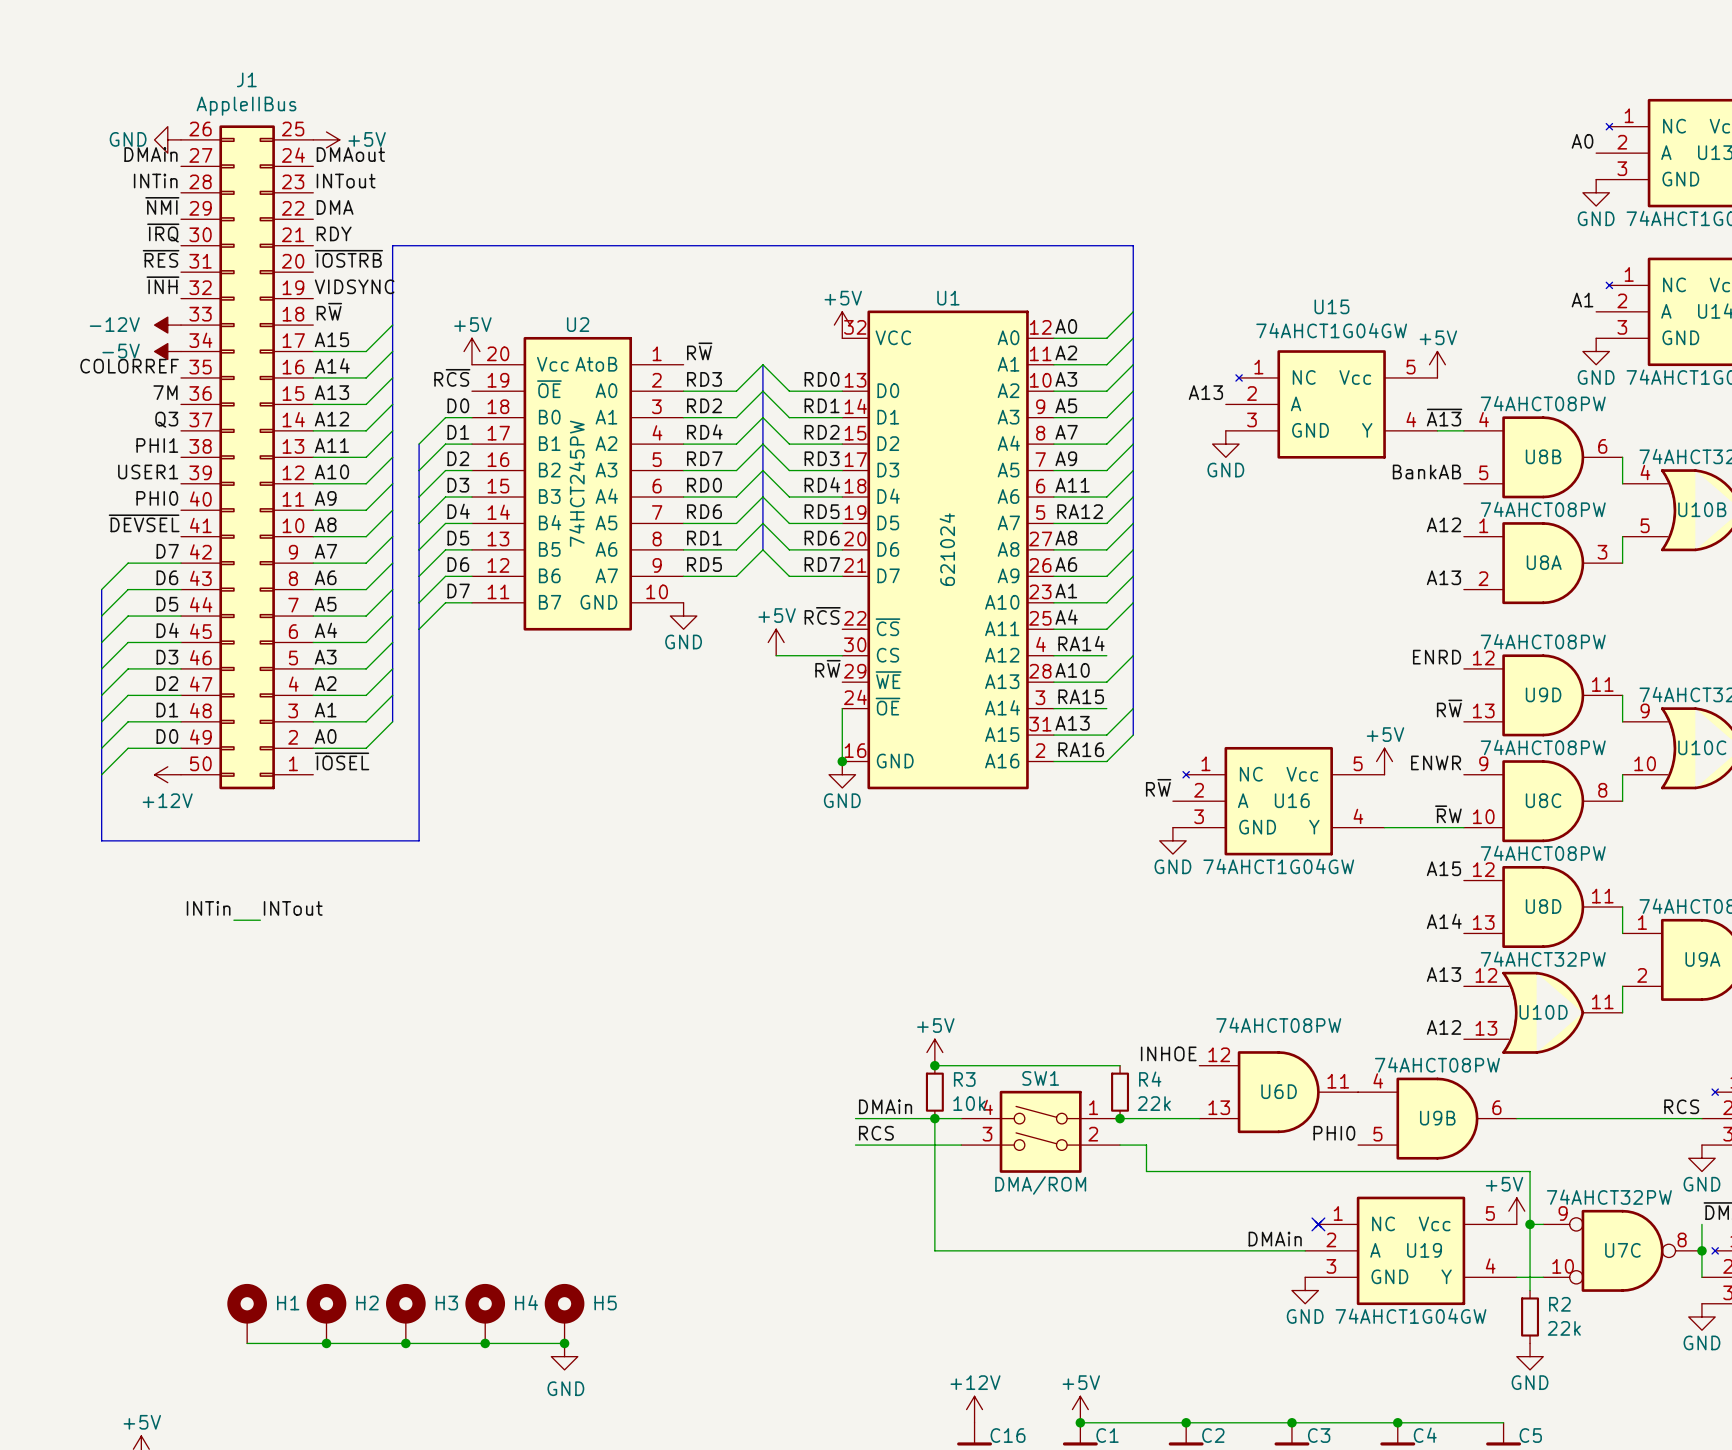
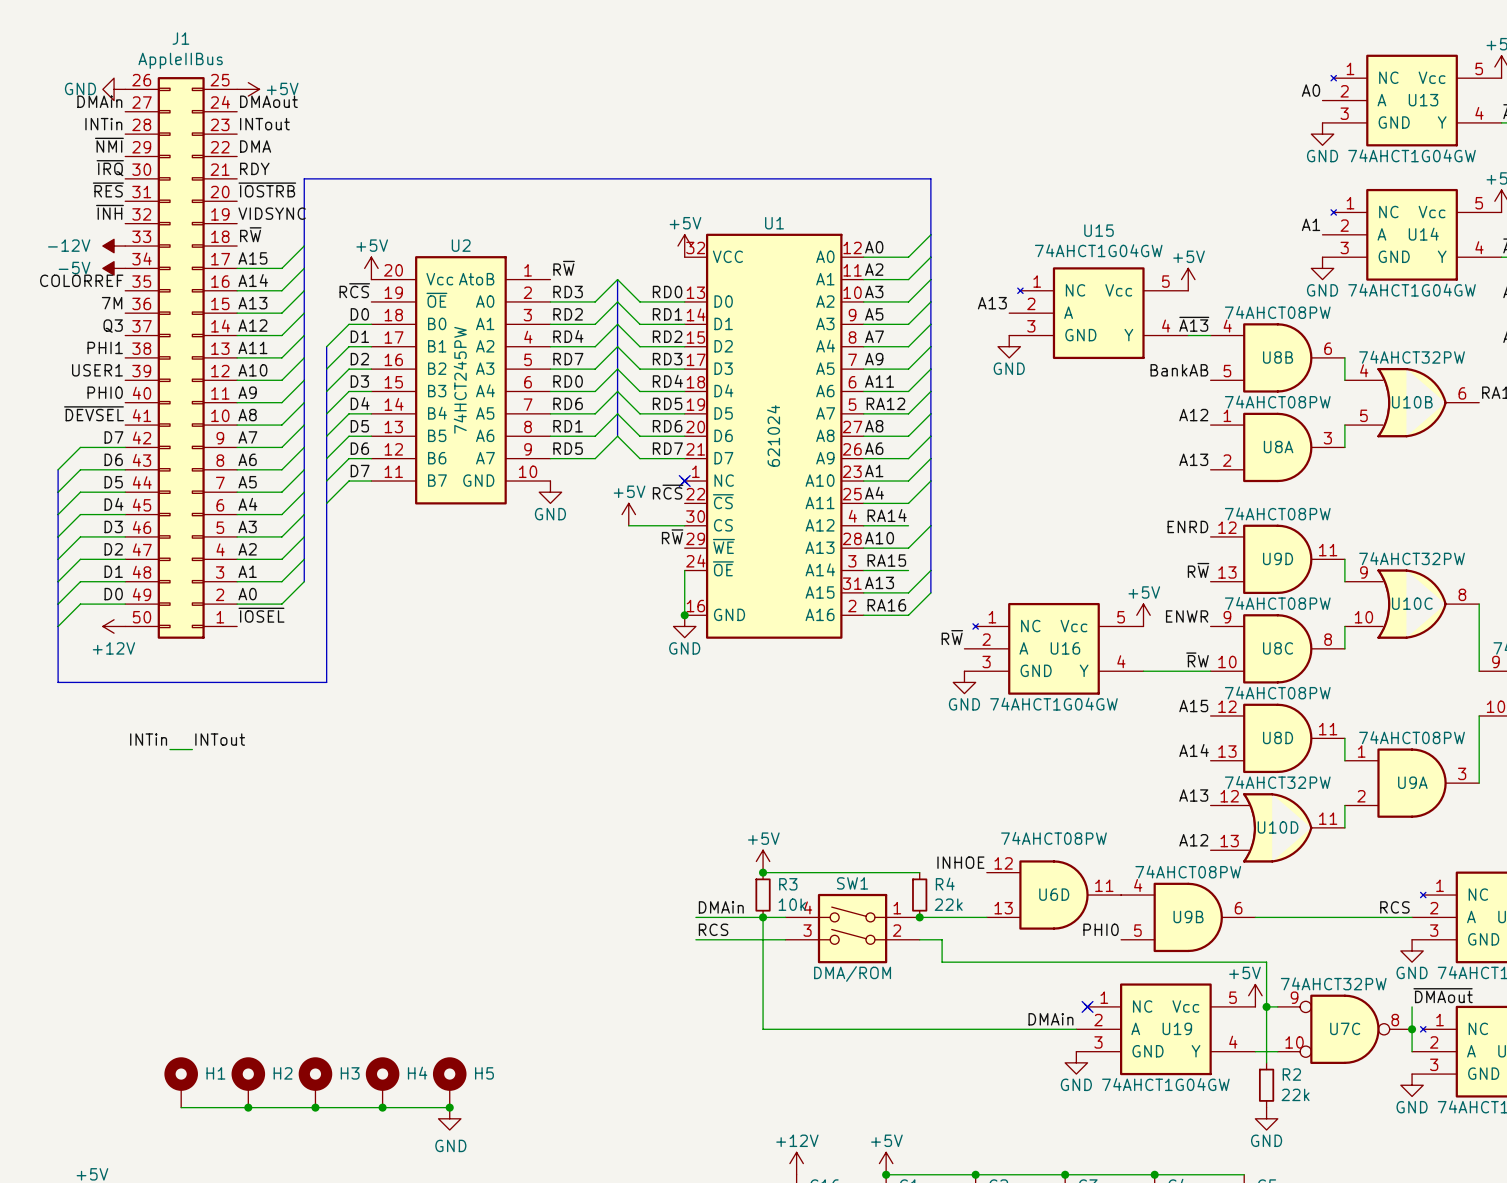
U1 symbol: [842, 310, 1054, 790] -> [682, 233, 864, 639]
no-connect mark: none -> (684, 481)

